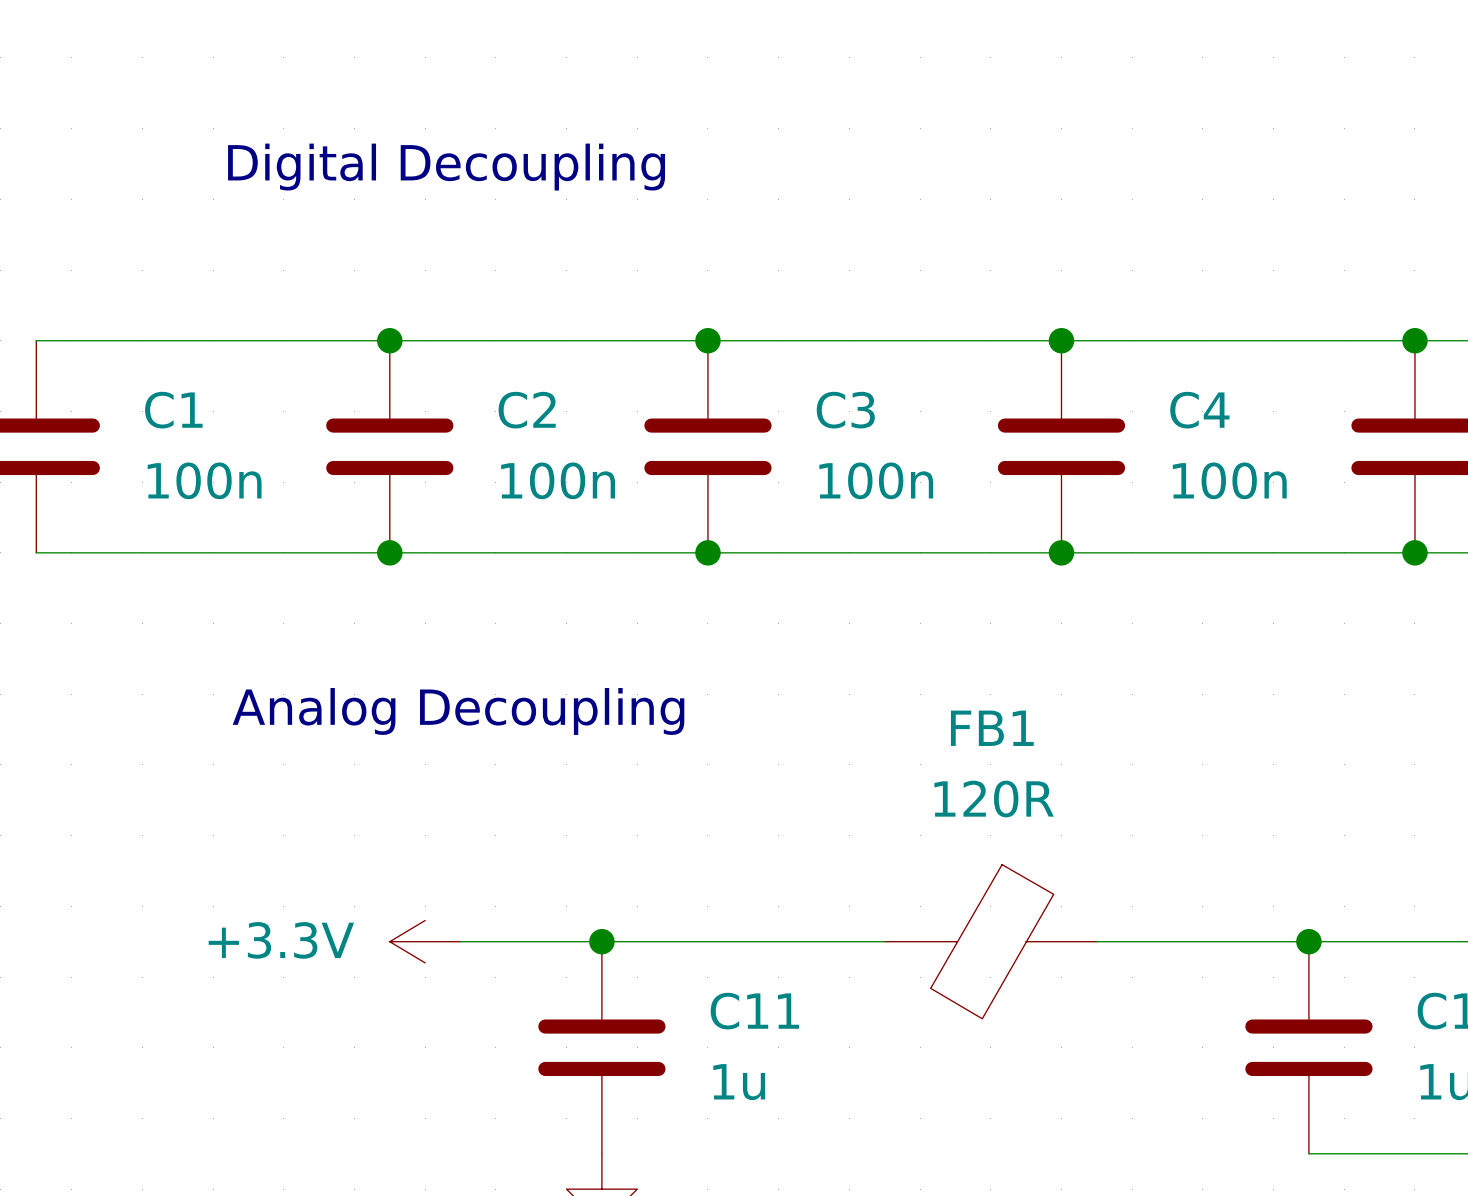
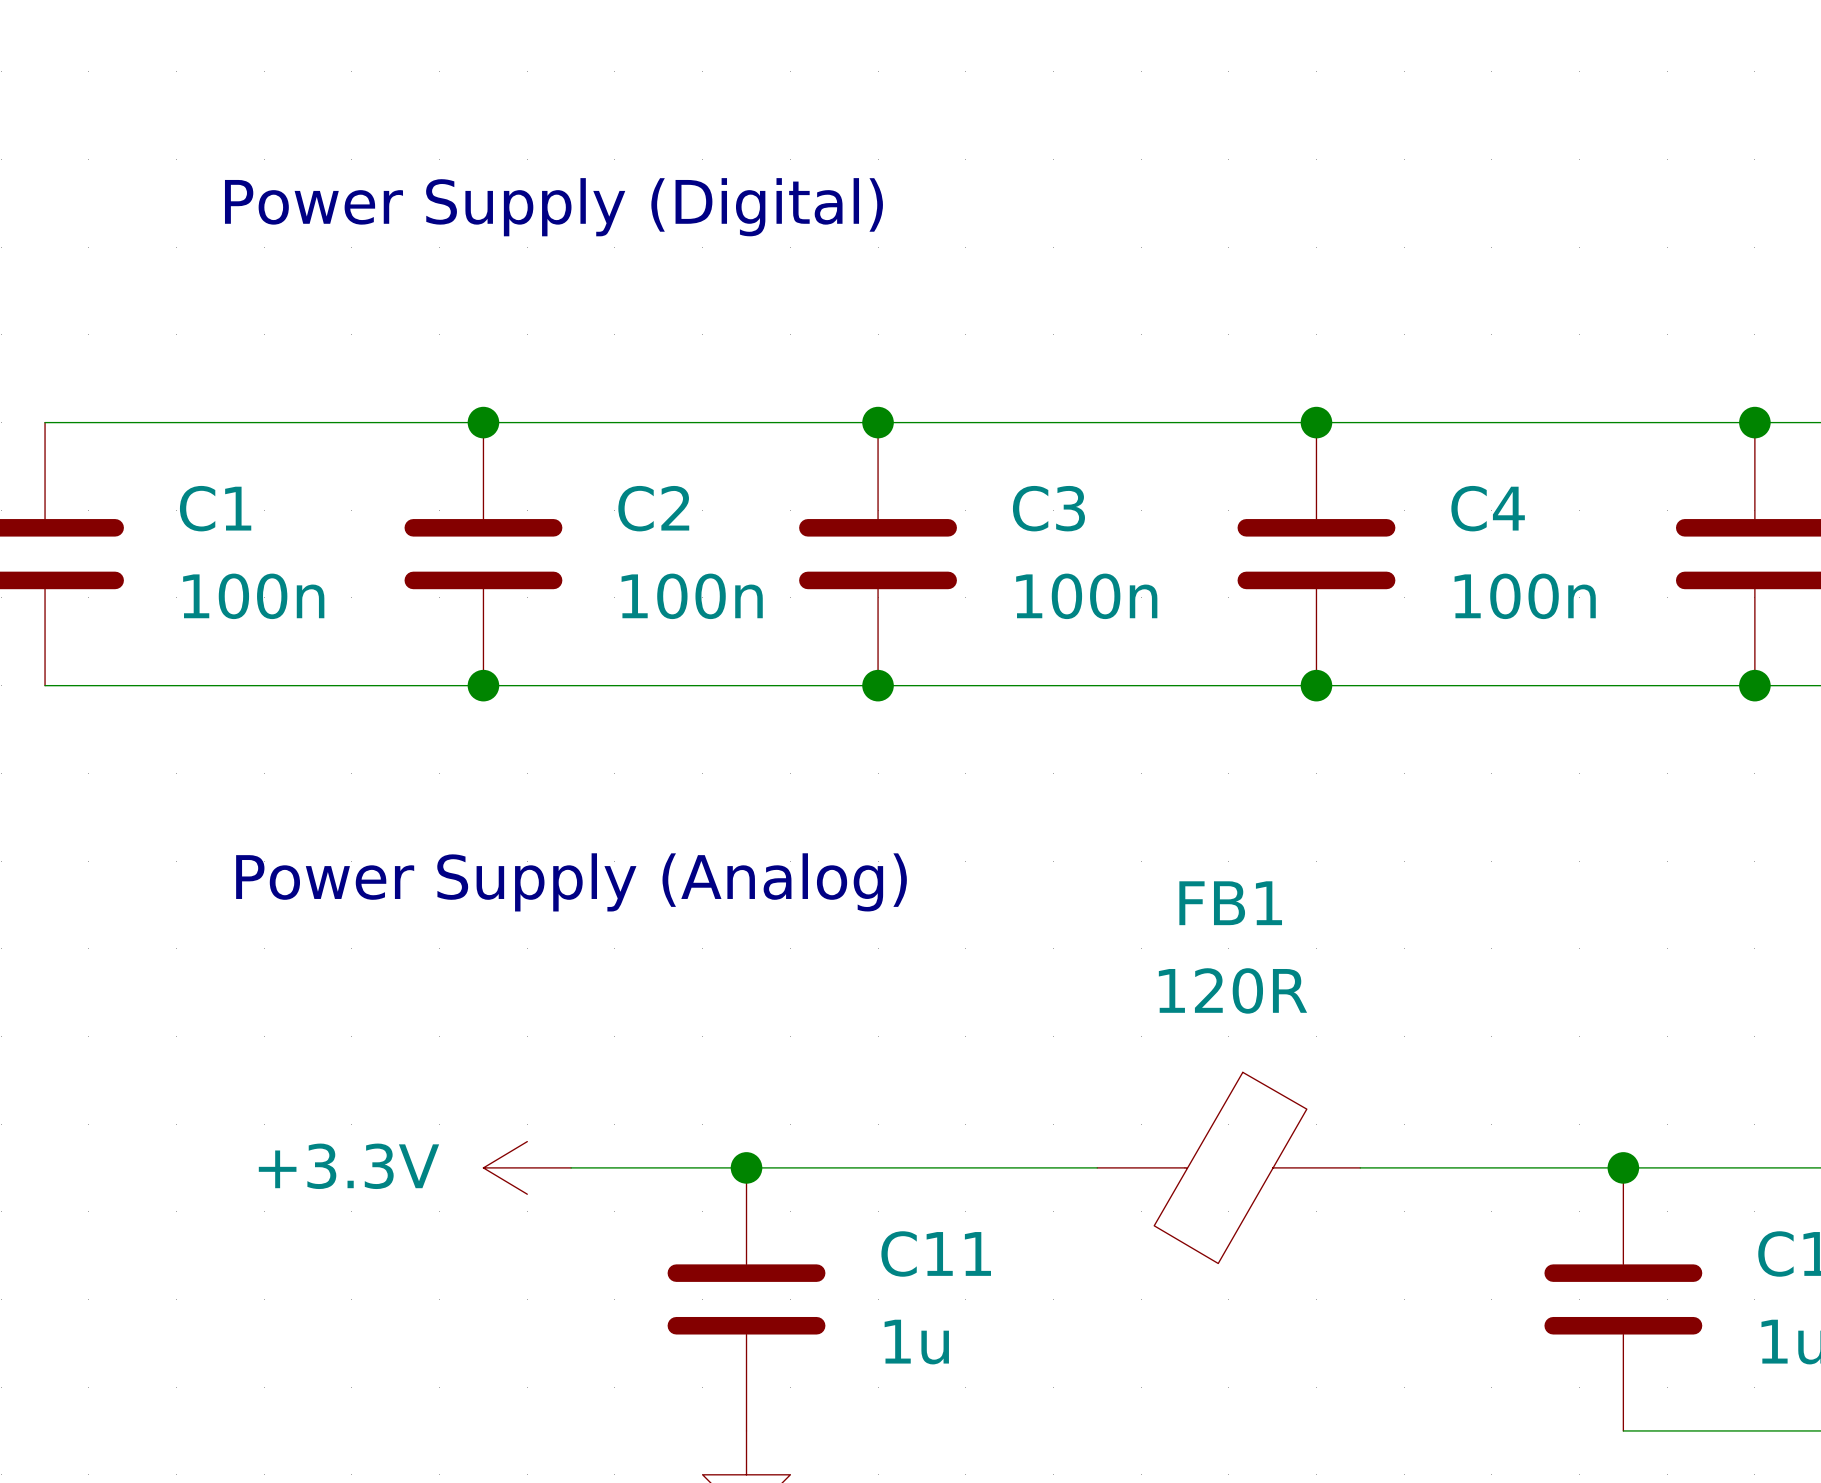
text: Digital Decoupling (446, 167) -> Power Supply (Digital) (553, 207)
text: Analog Decoupling (458, 711) -> Power Supply (Analog) (571, 882)

